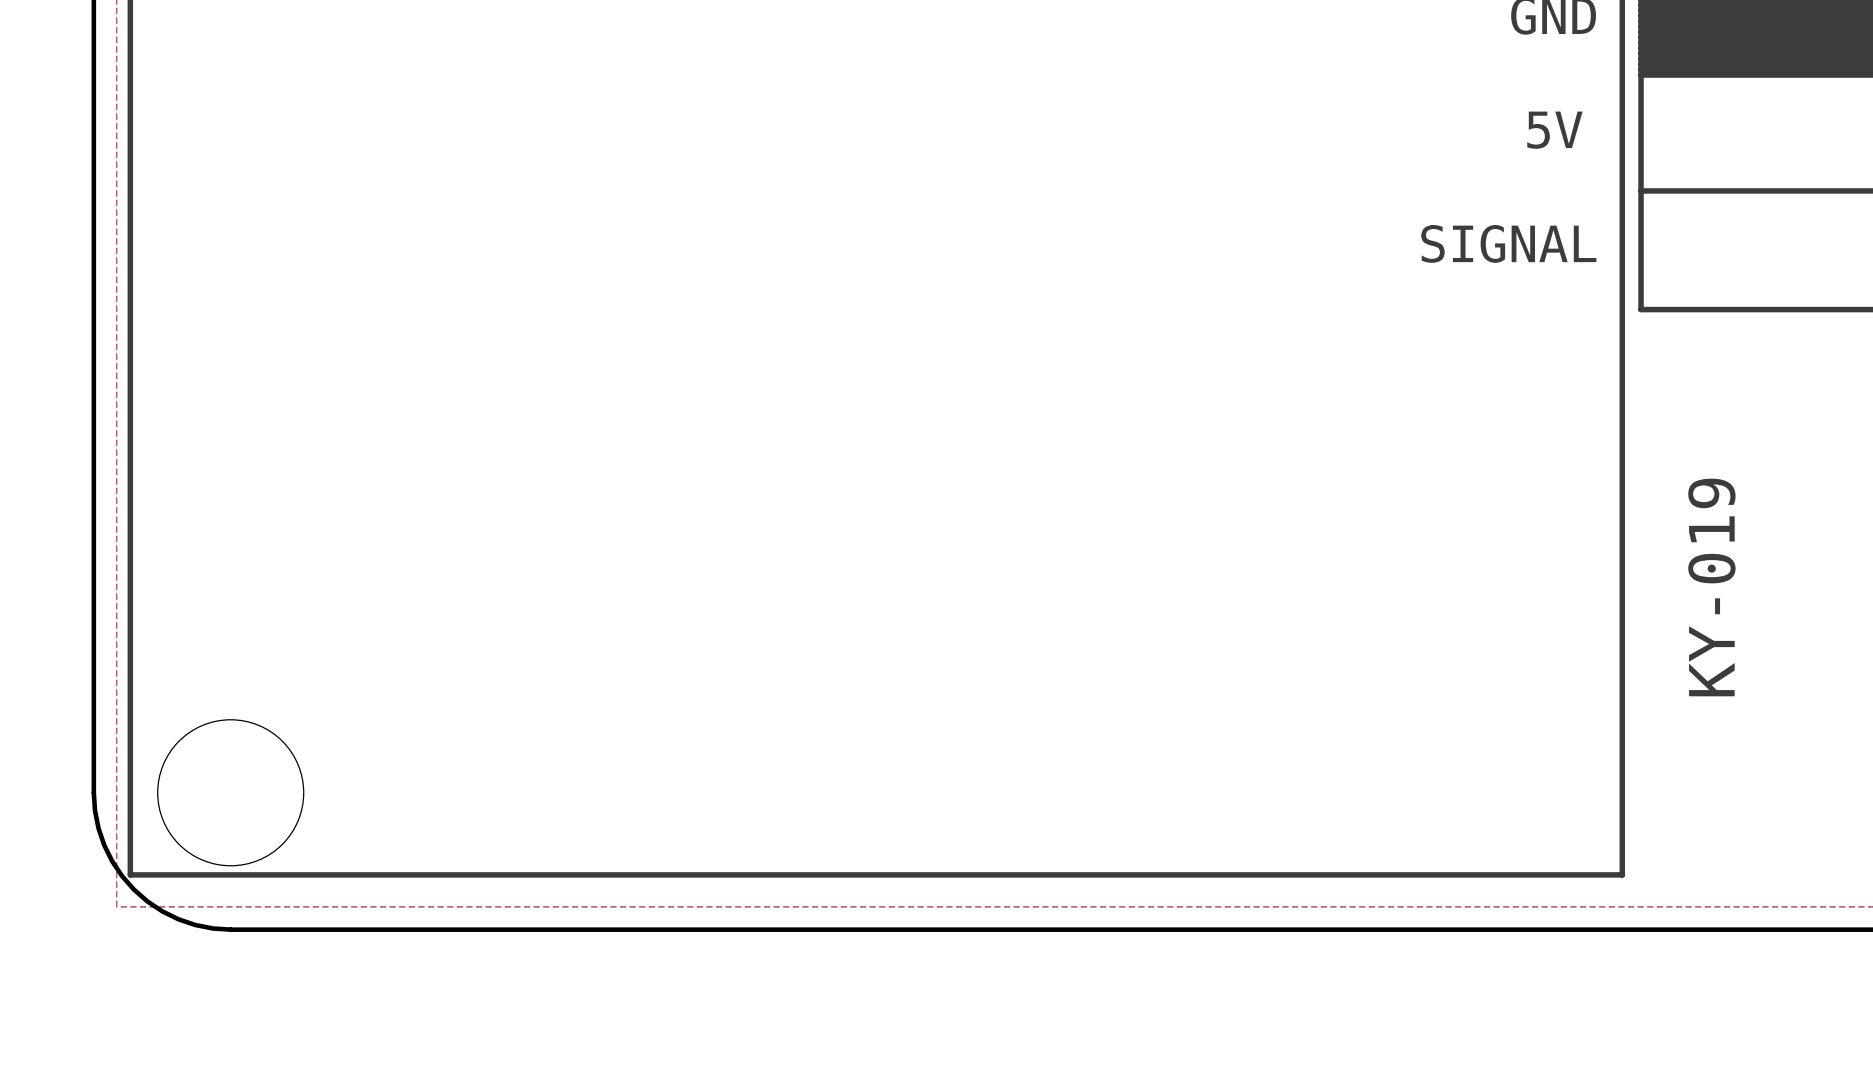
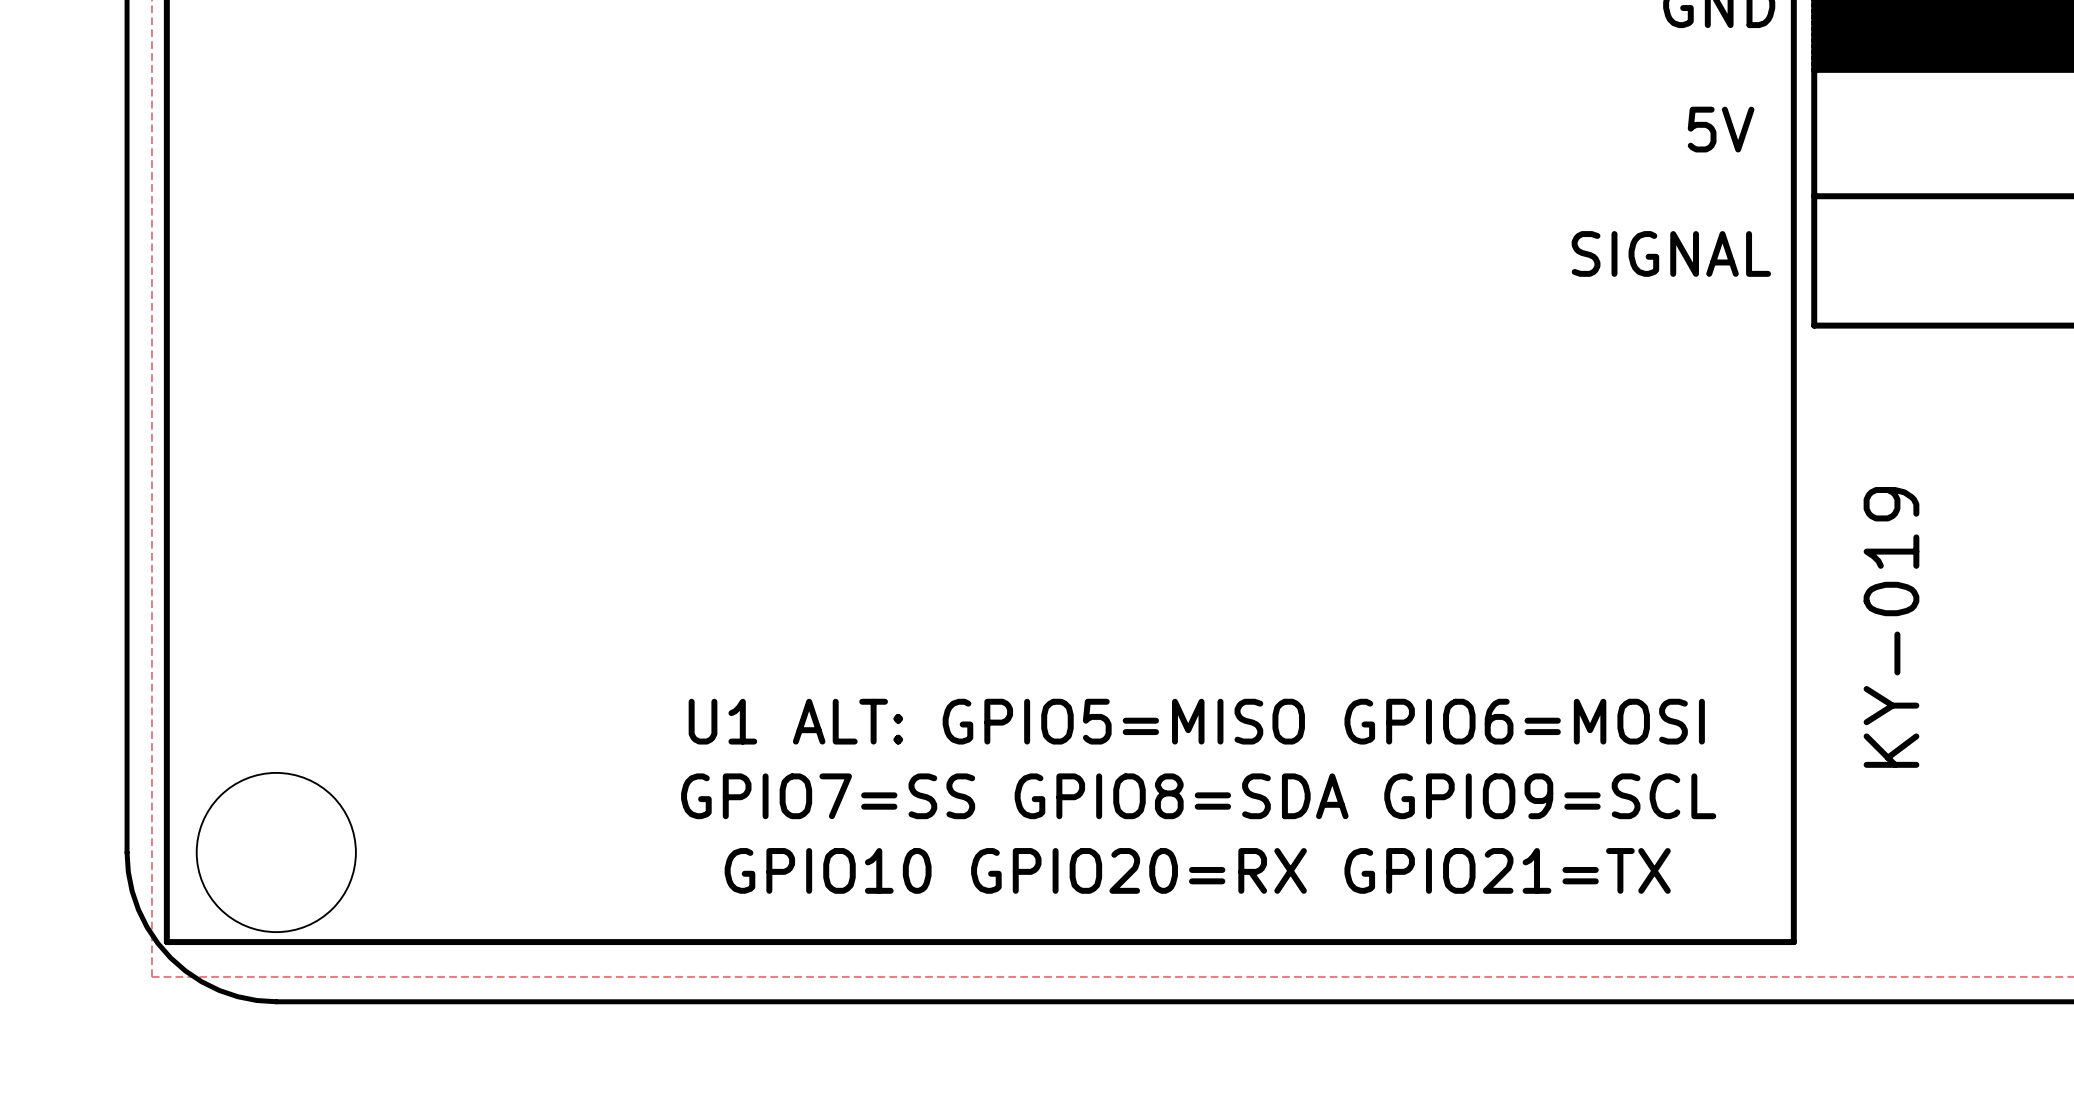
text: none -> U1 ALT: GPIO5=MISO GPIO6=MOSI (1196, 721)
text: none -> GPIO7=SS GPIO8=SDA GPIO9=SCL (1198, 796)
text: none -> GPIO10 GPIO20=RX GPIO21=TX (1197, 870)

